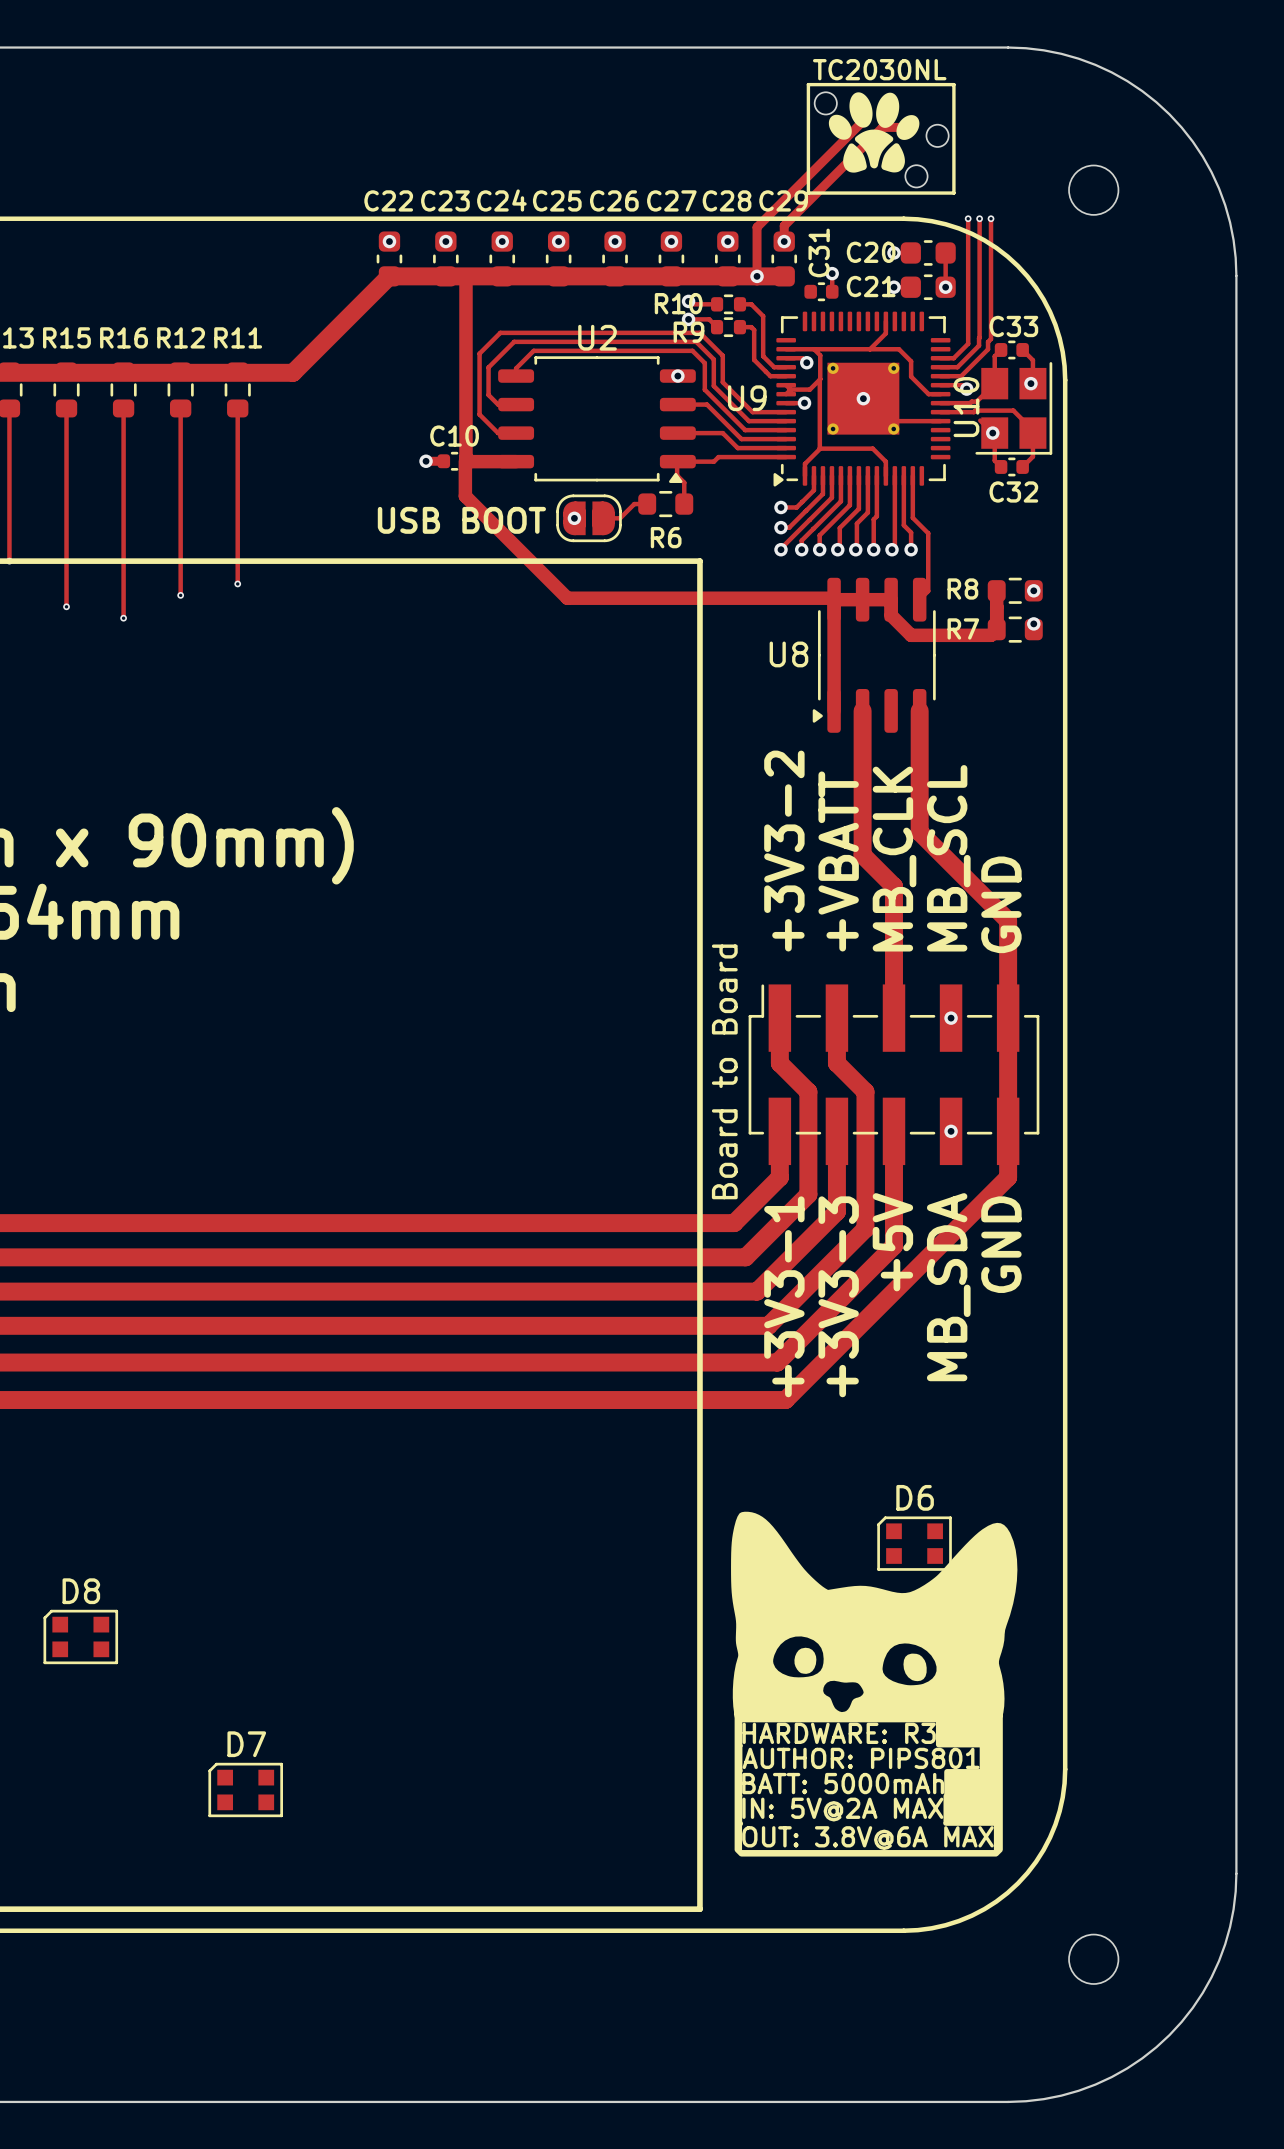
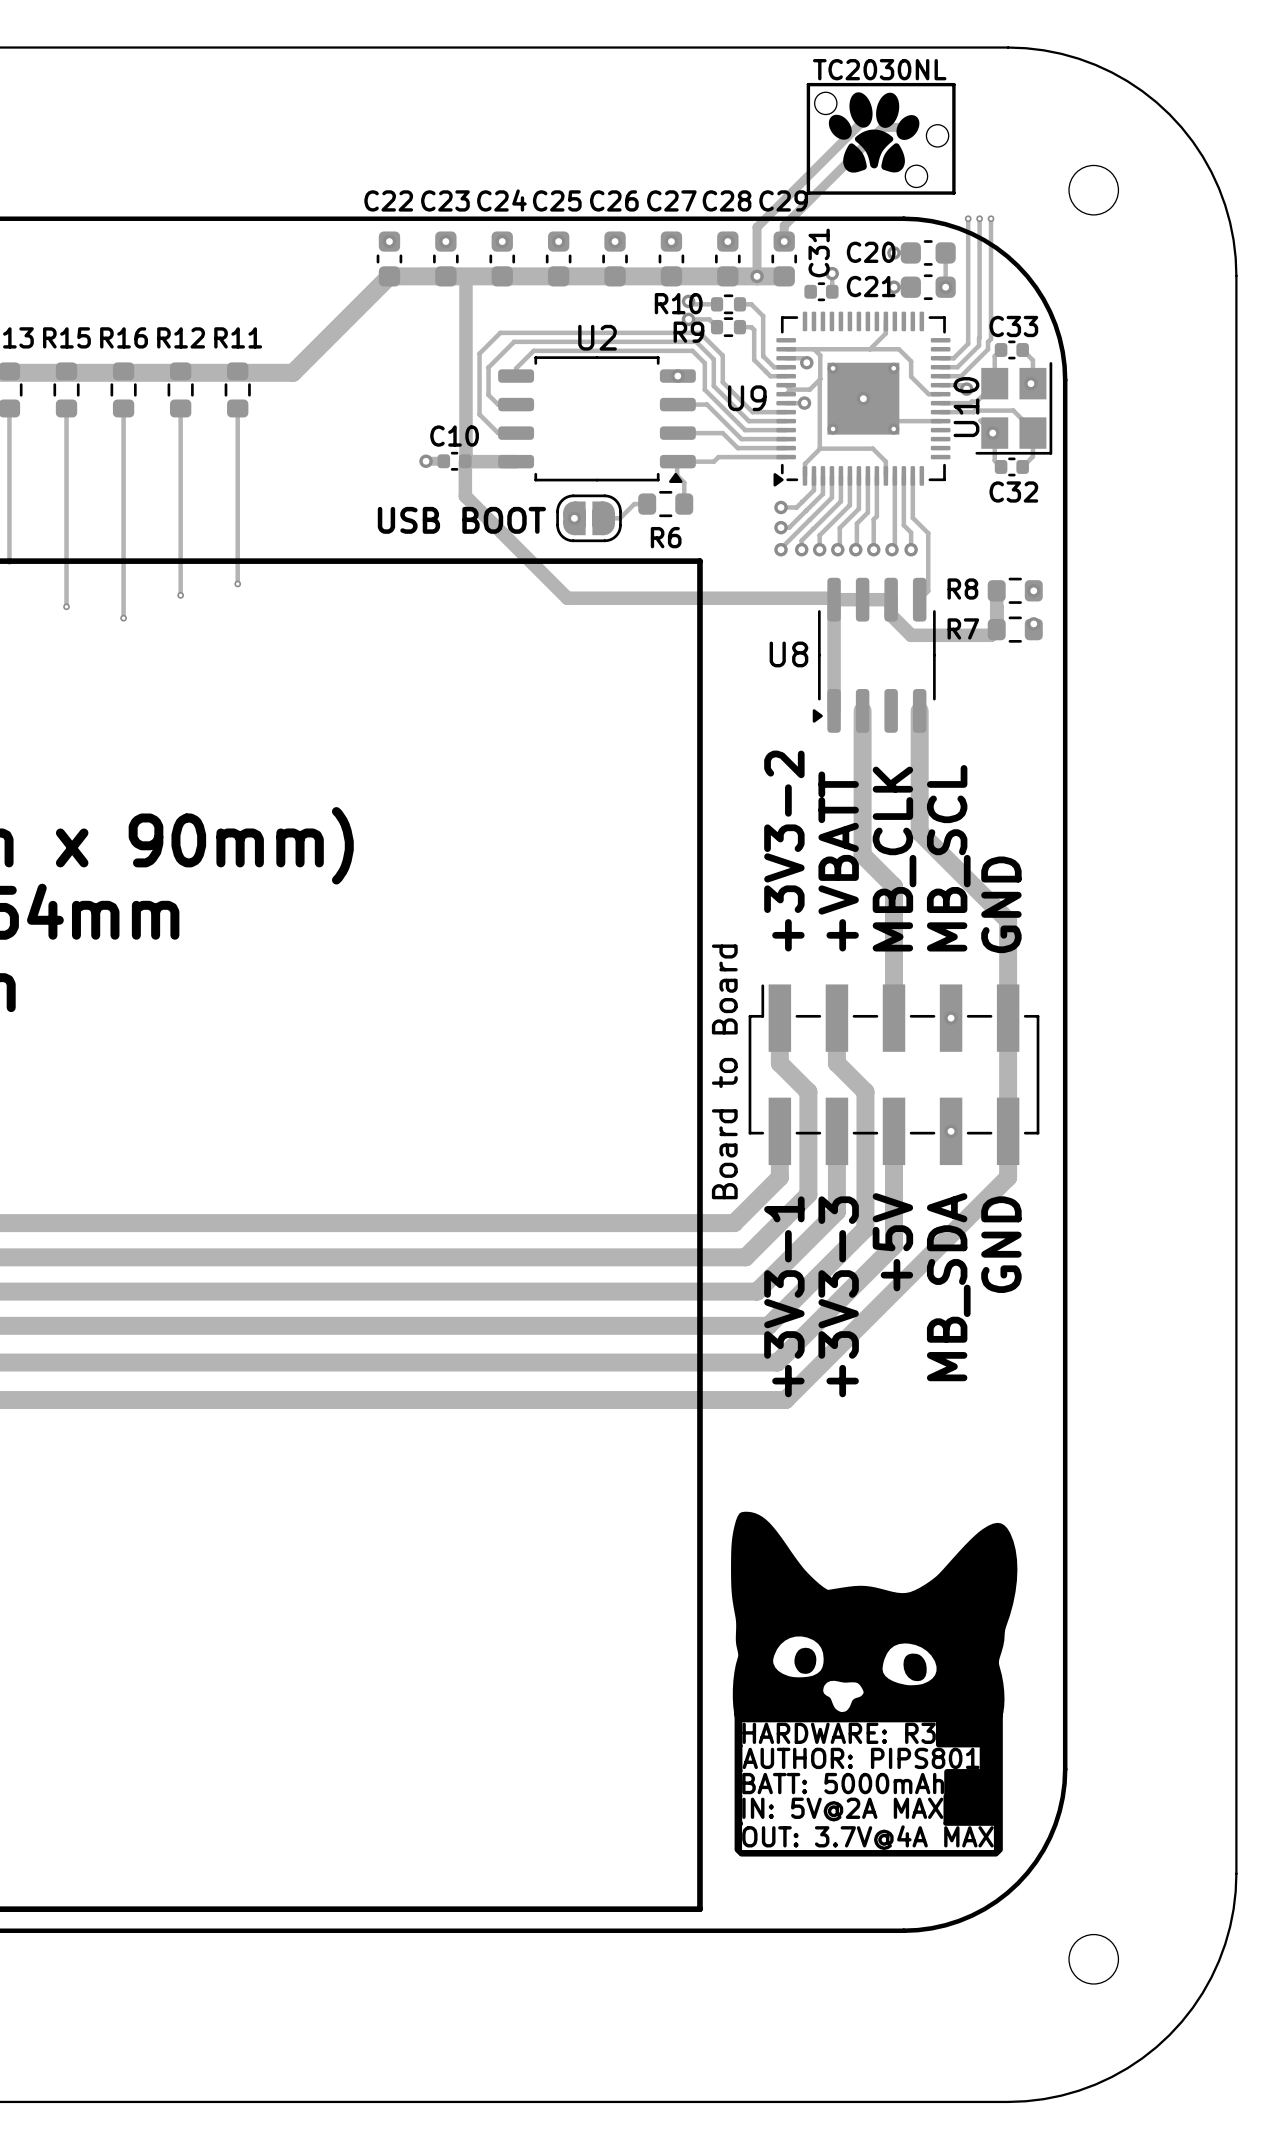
D6: (914, 1543) -> none
D8: (80, 1636) -> none
D7: (245, 1789) -> none
text: OUT: 3.8V@6A MAX (867, 1838) -> OUT: 3.7V@4A MAX (867, 1837)

